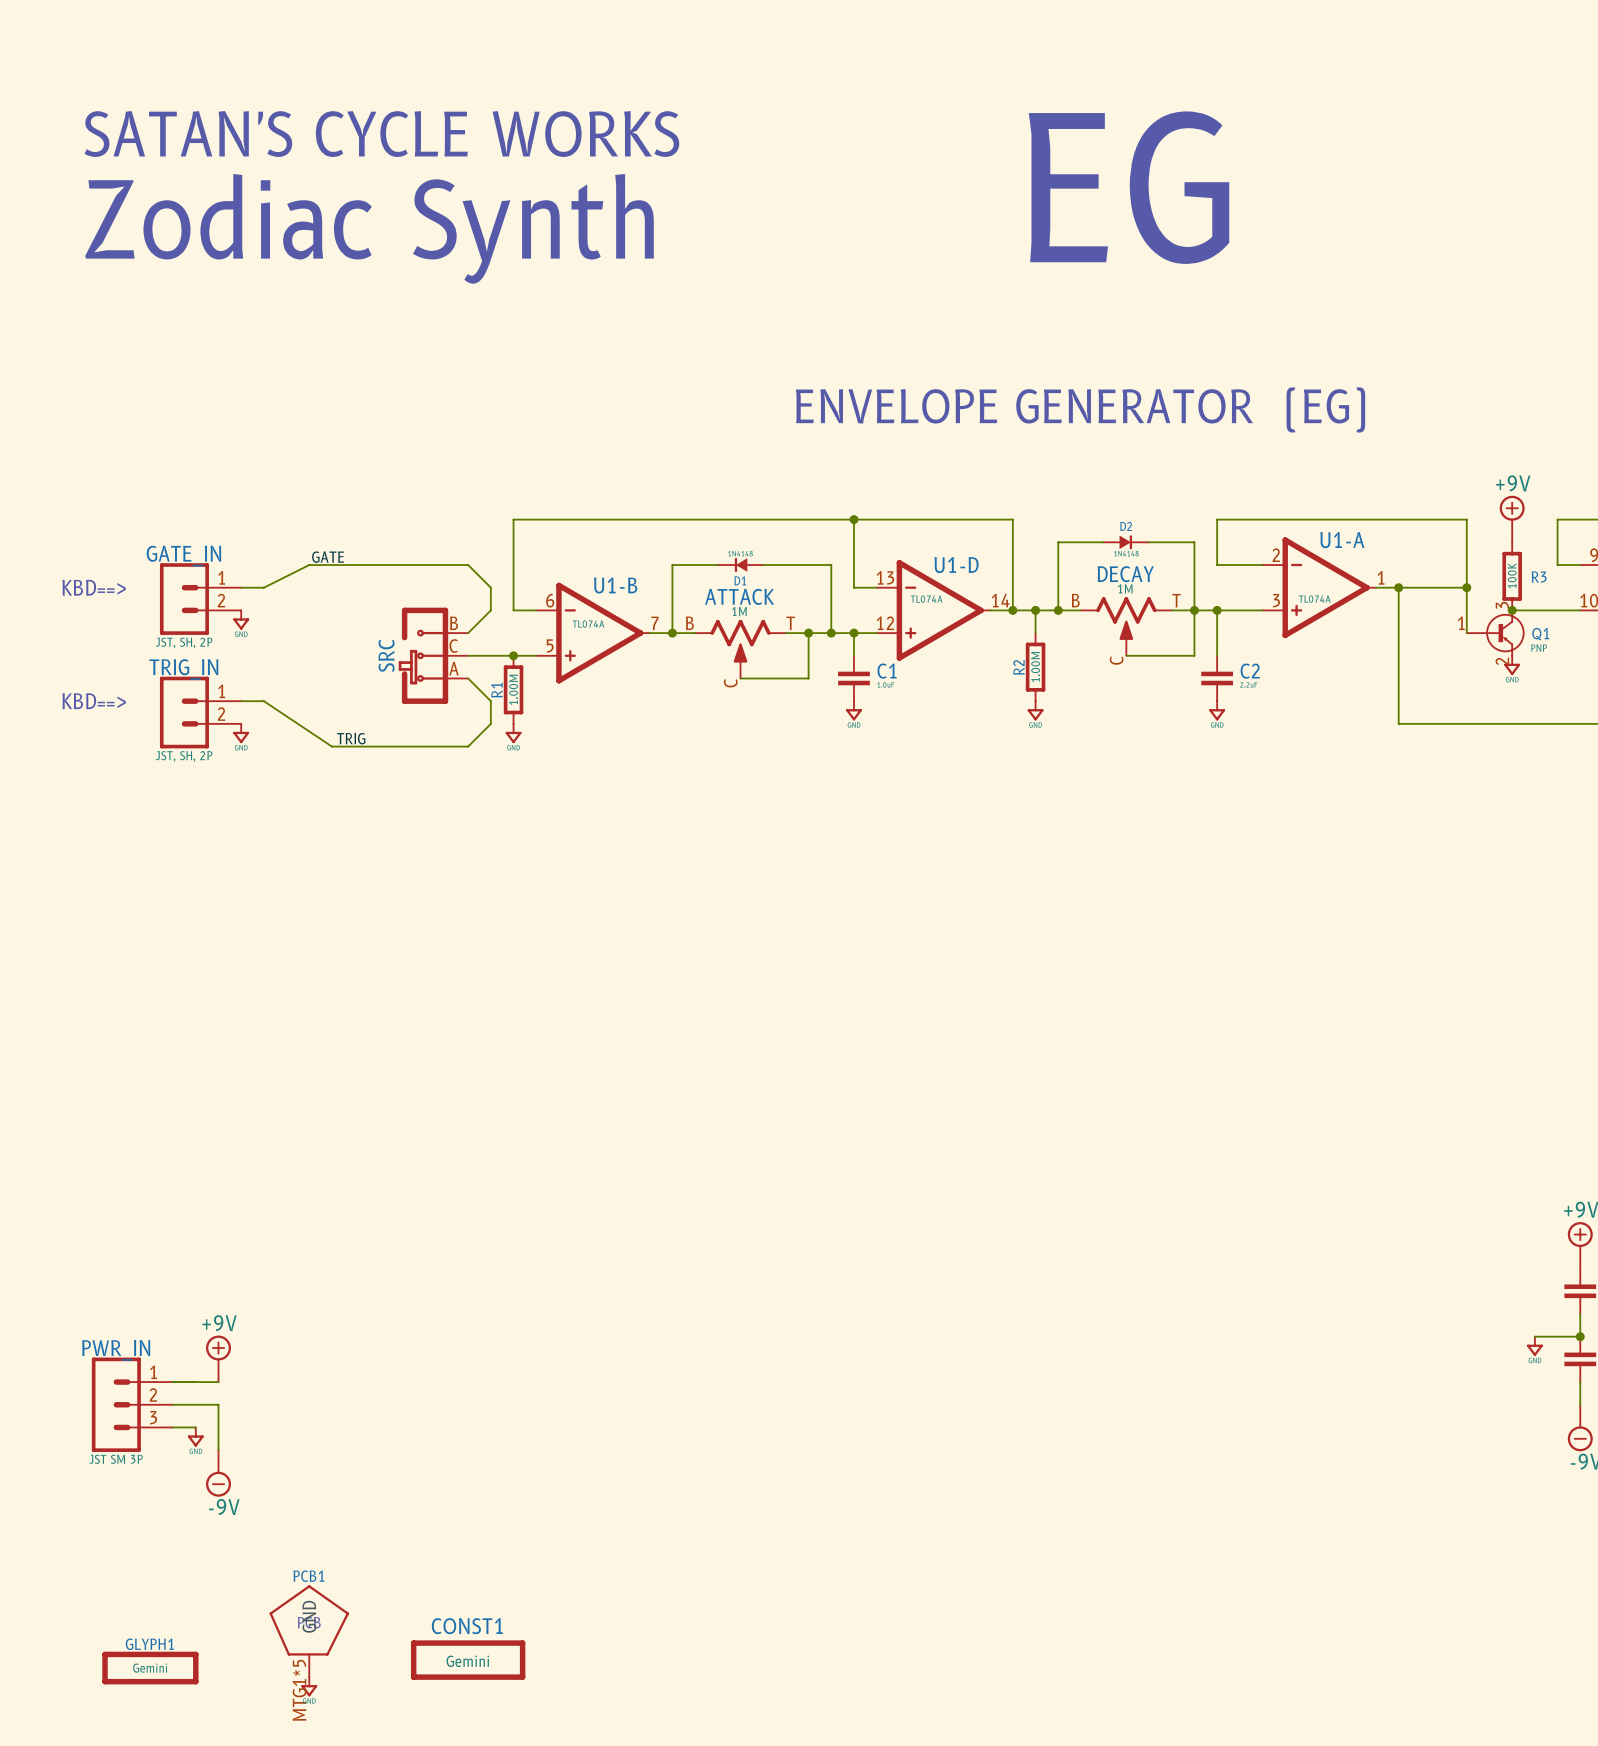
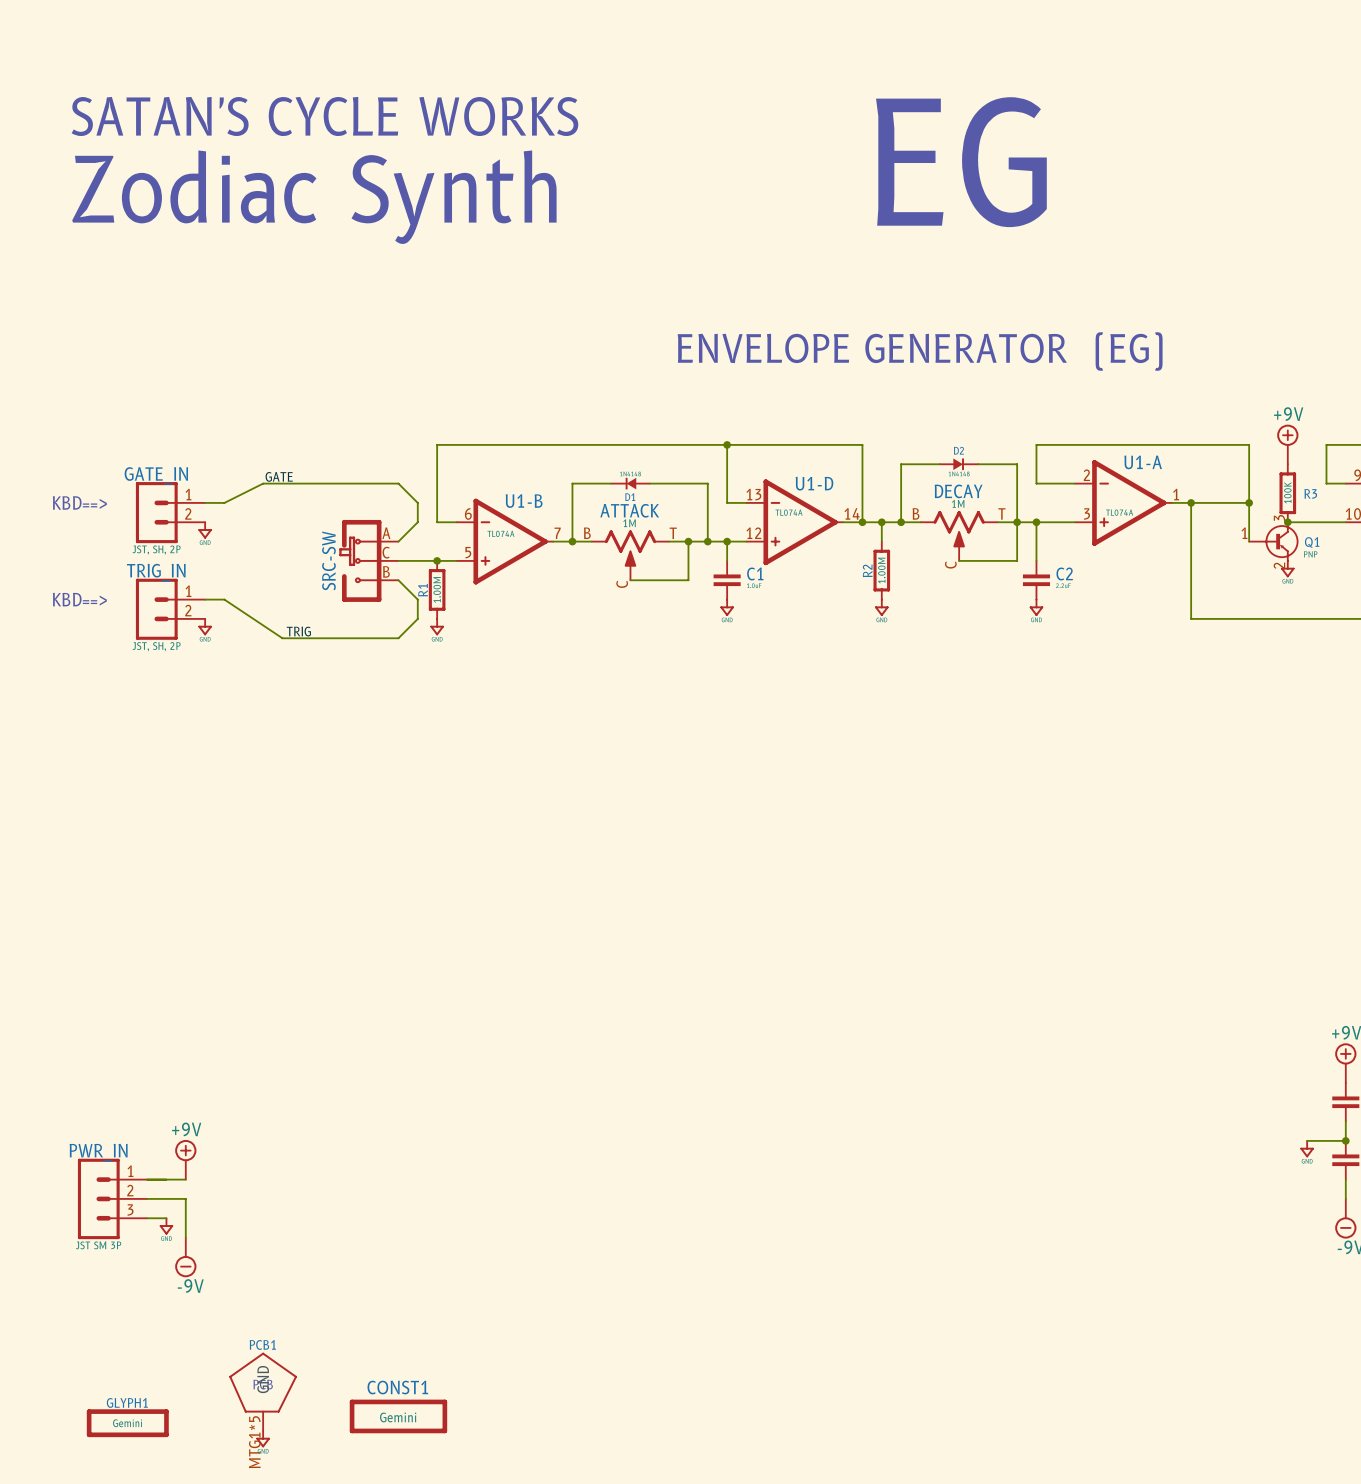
SRC: (433, 655) -> none
SRC-SW: none -> (368, 560)

